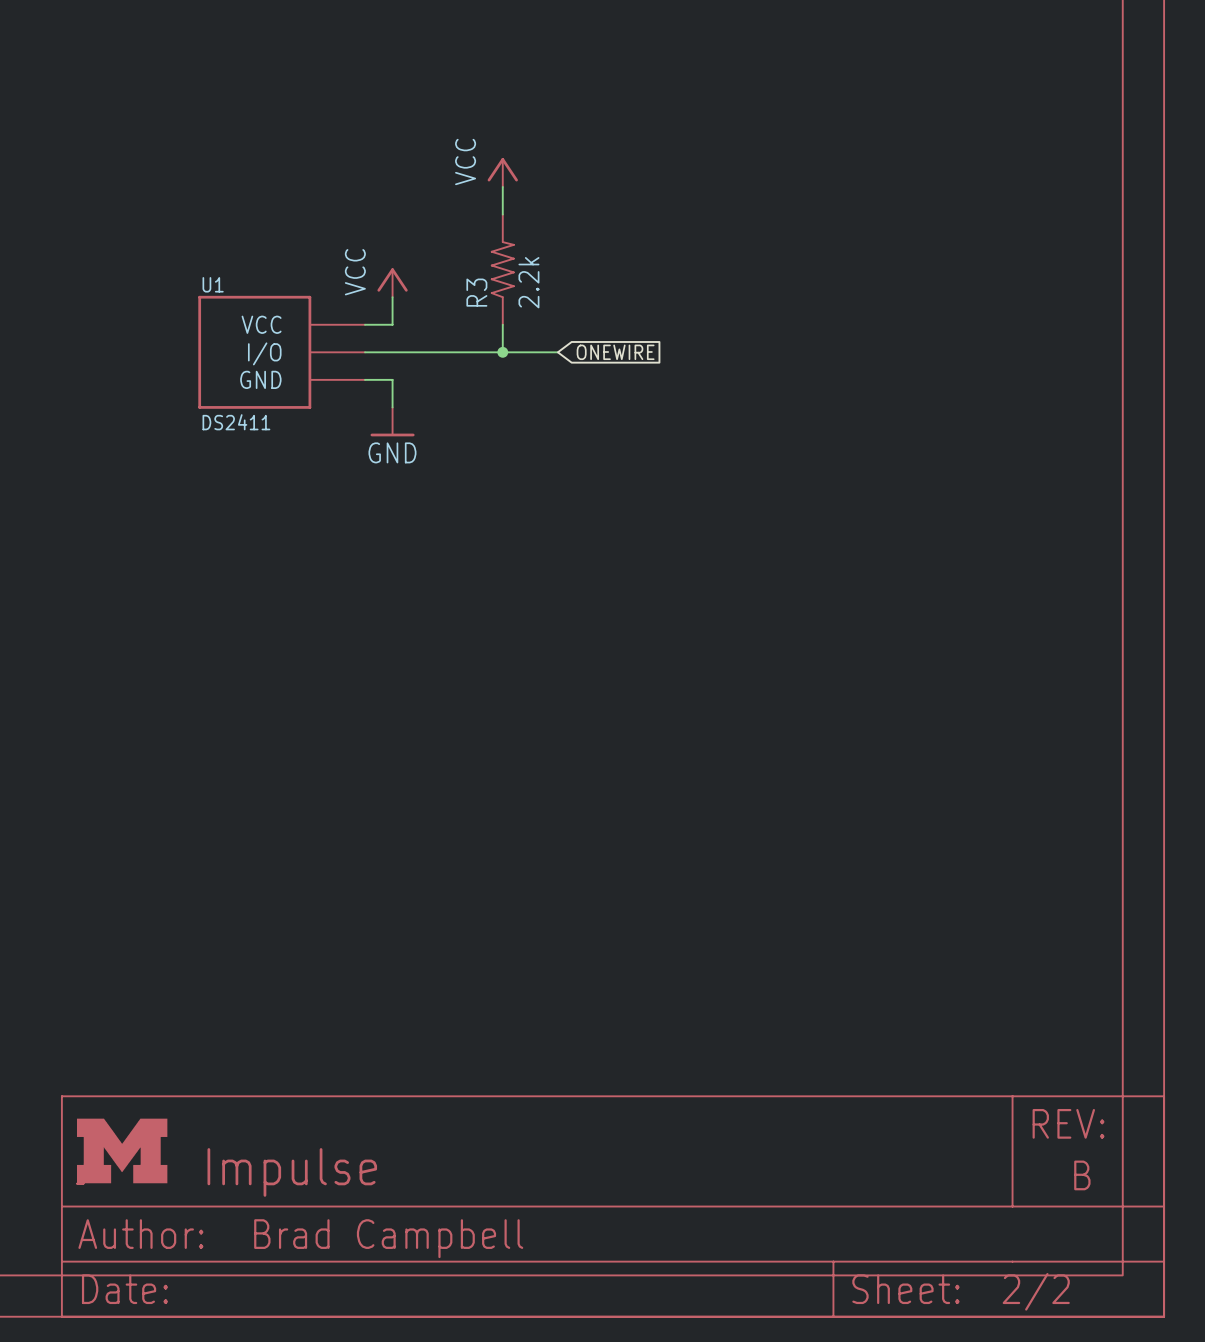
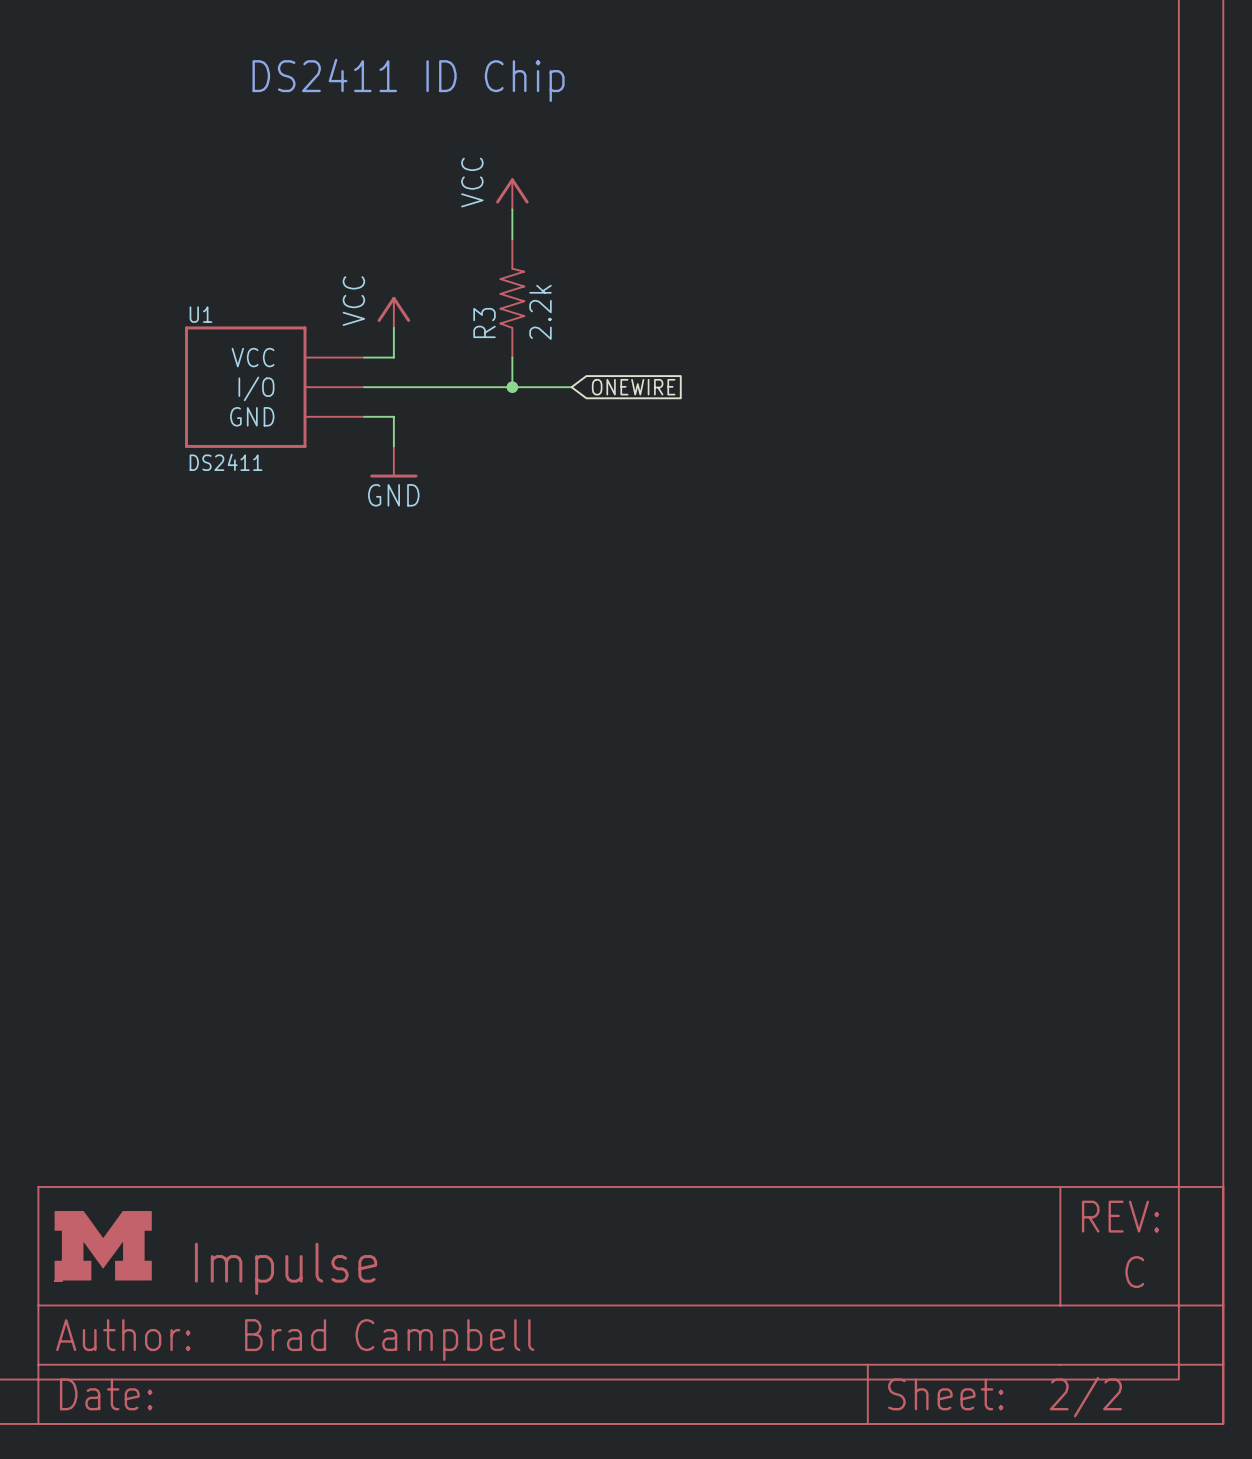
text: none -> DS2411 ID Chip (408, 80)
part text: B (1082, 1175) -> C (1134, 1272)

